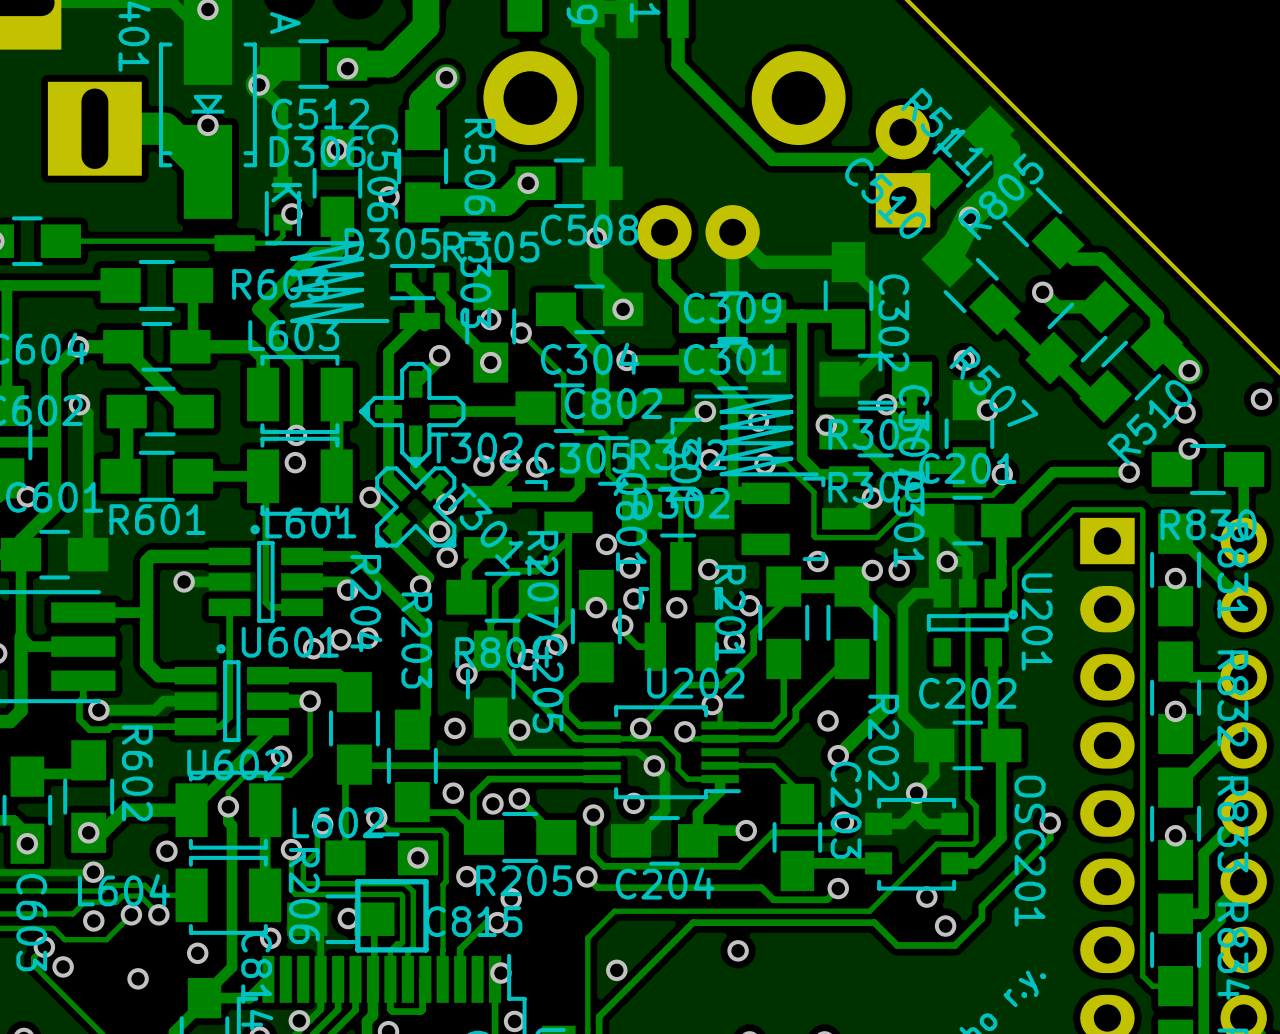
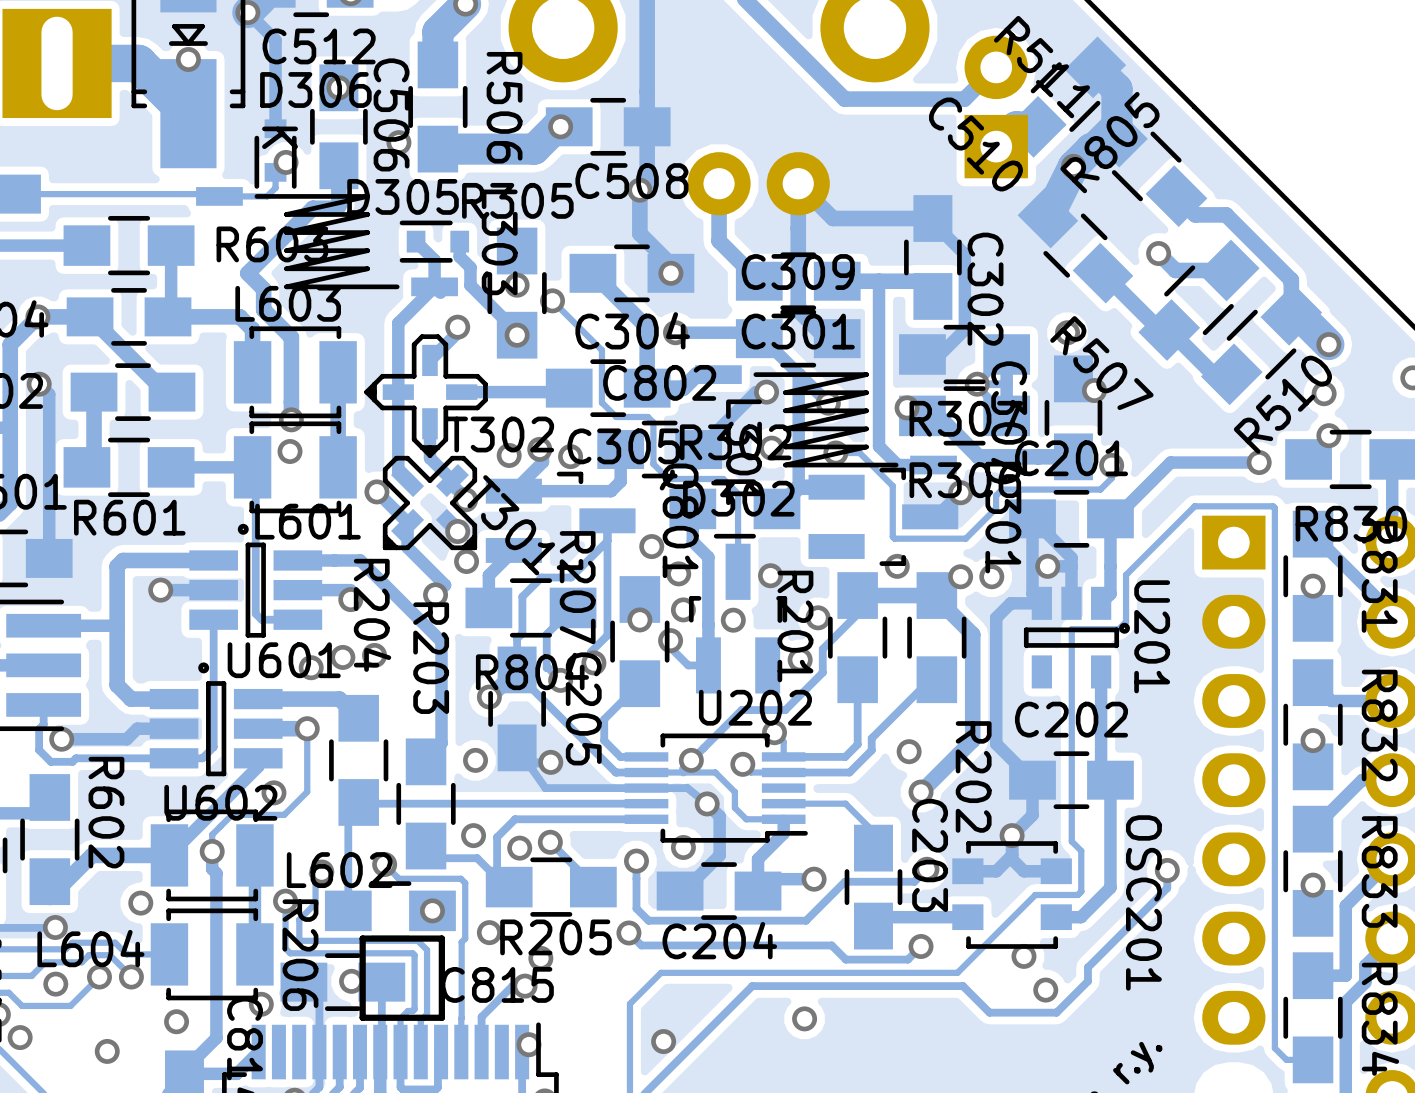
via: (88, 832) -> none

